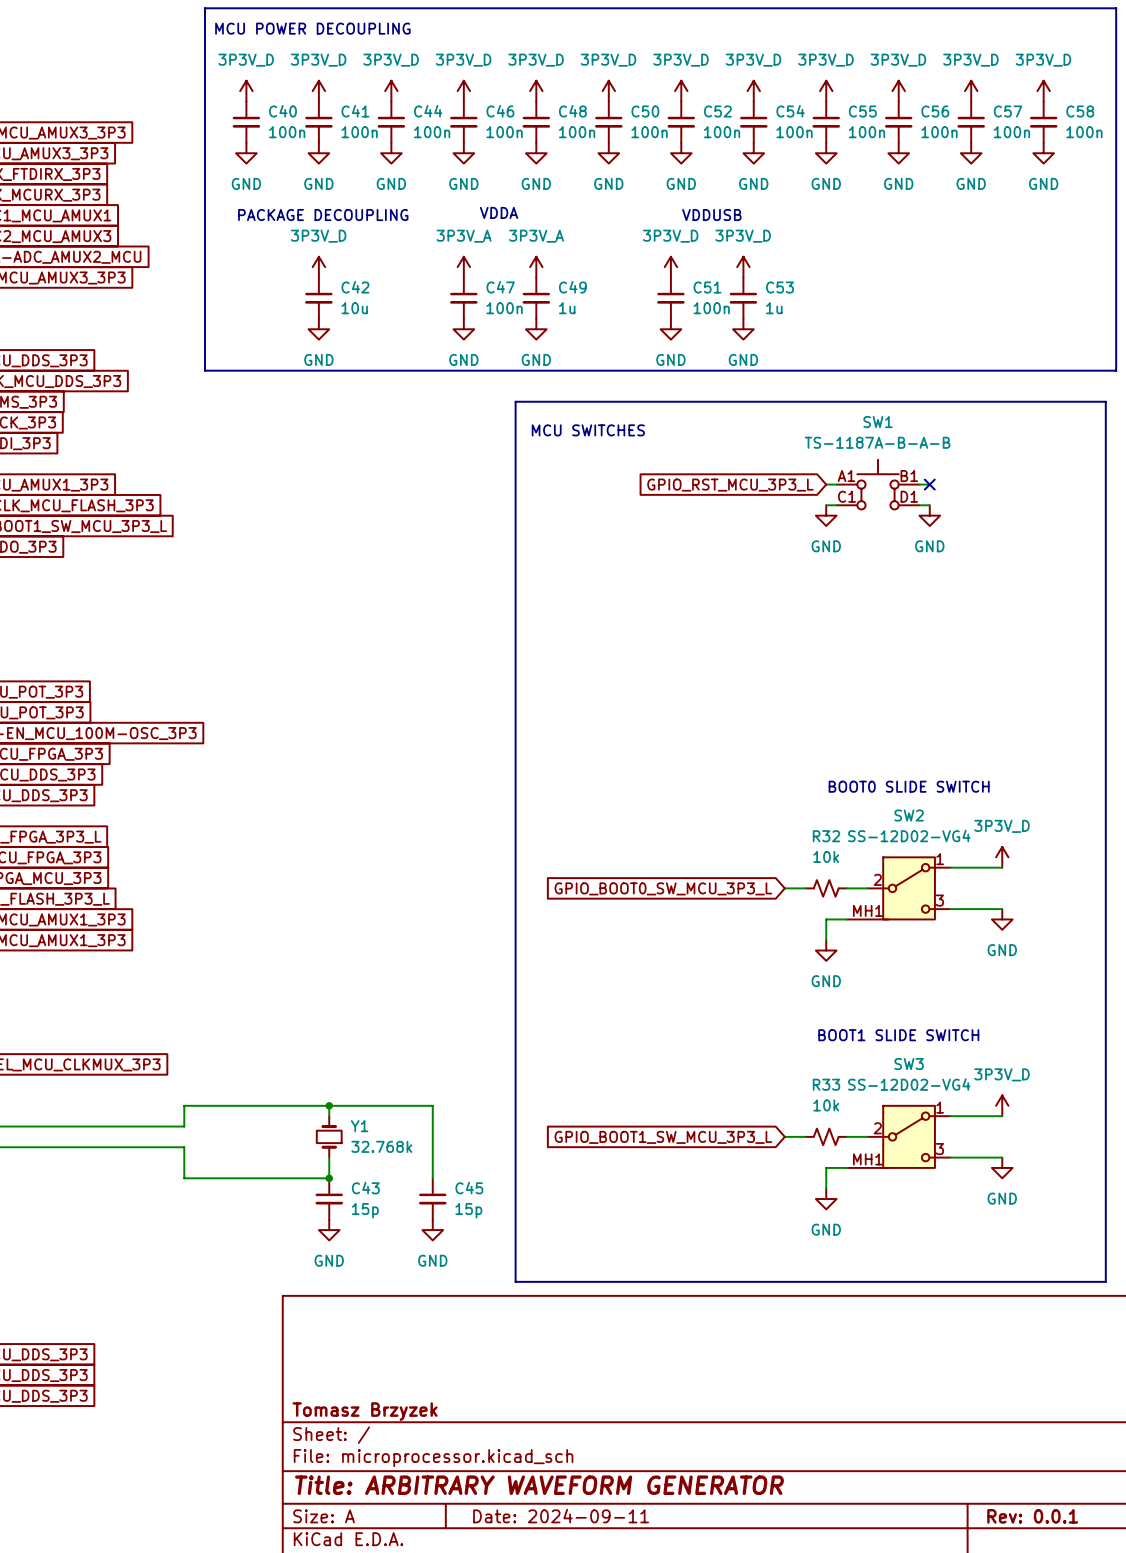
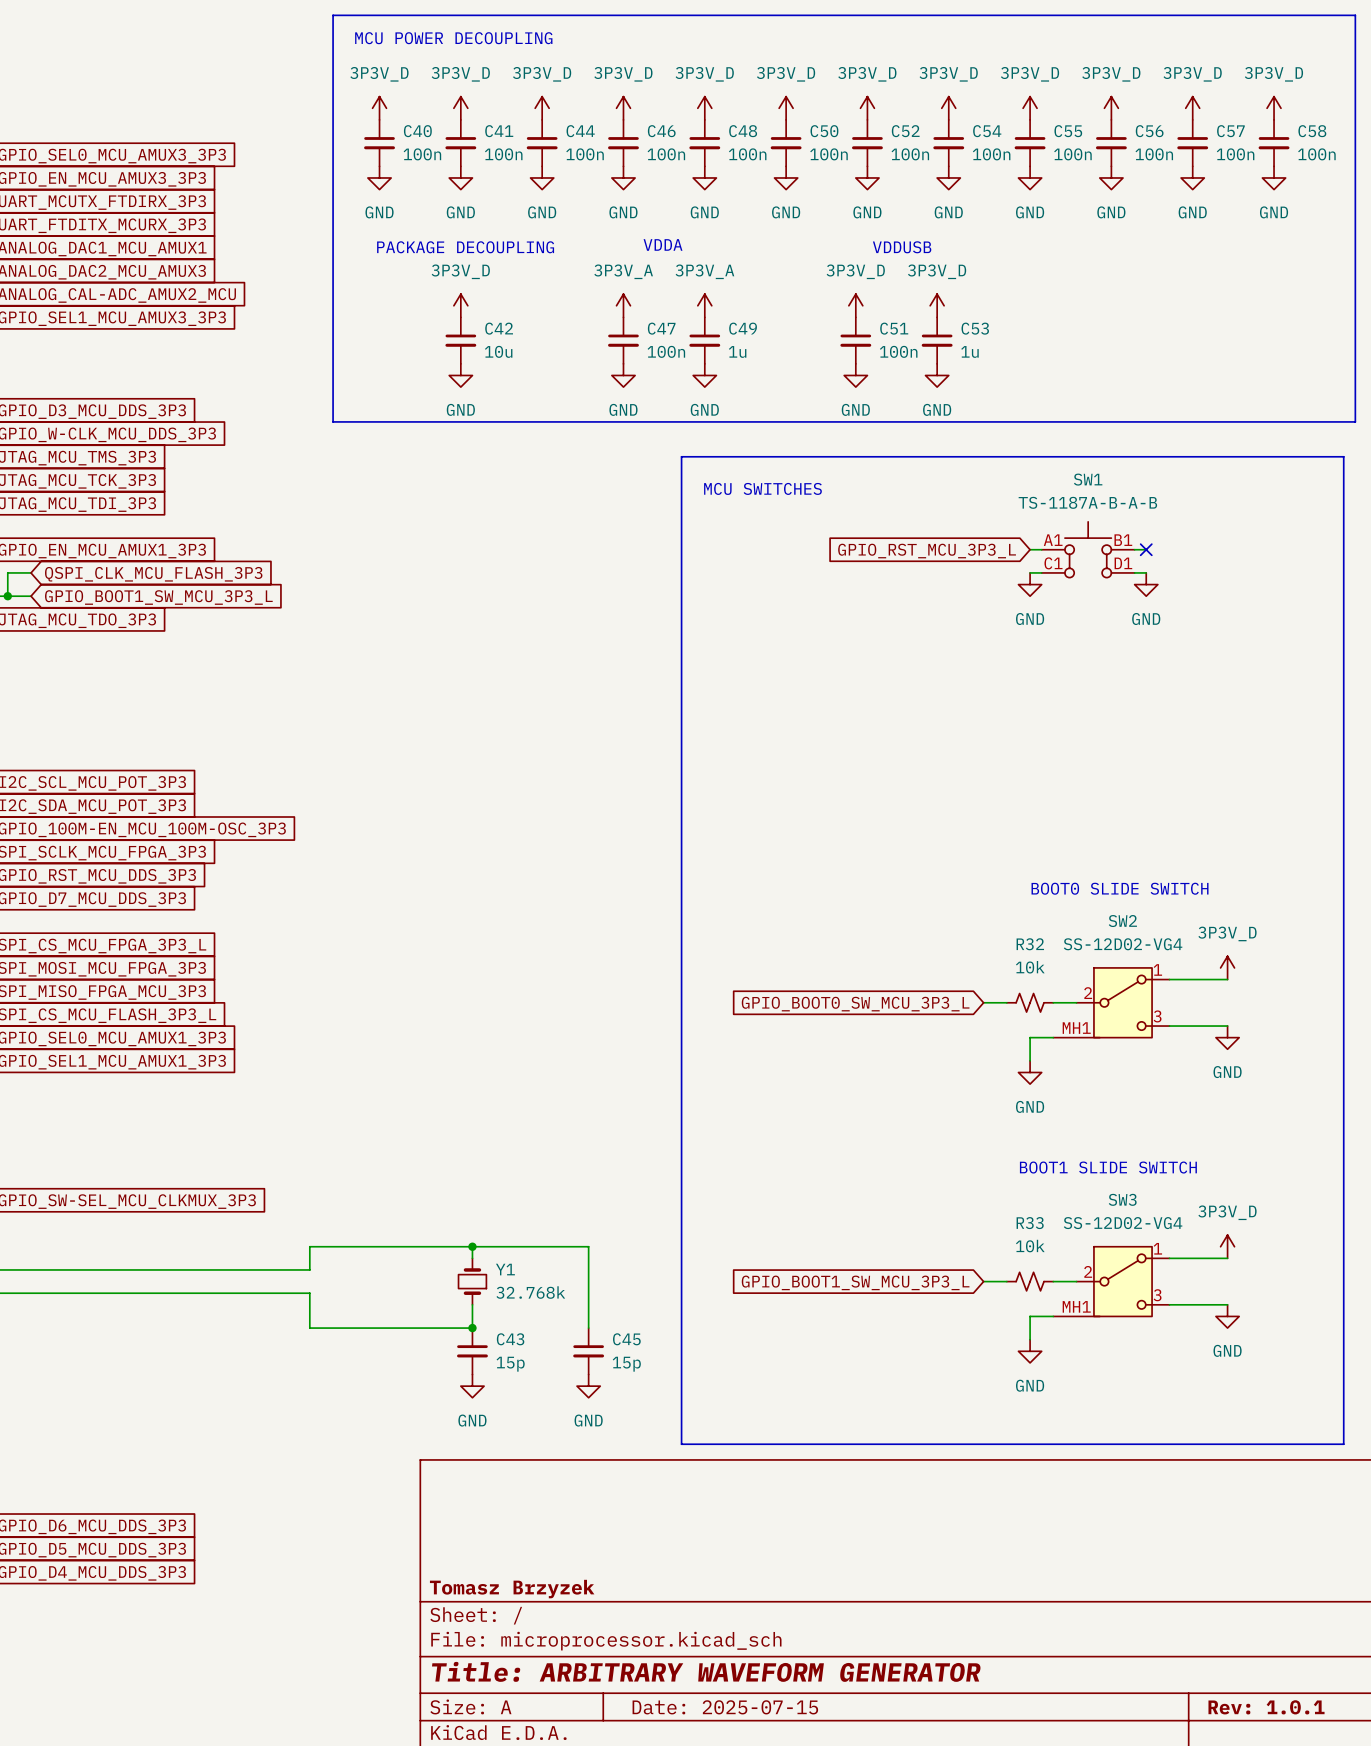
title block: Date: 2024-09-11 (561, 1516) -> Date: 2025-07-15 (725, 1707)
title block: Rev: 0.0.1 (1032, 1516) -> Rev: 1.0.1 (1266, 1707)

